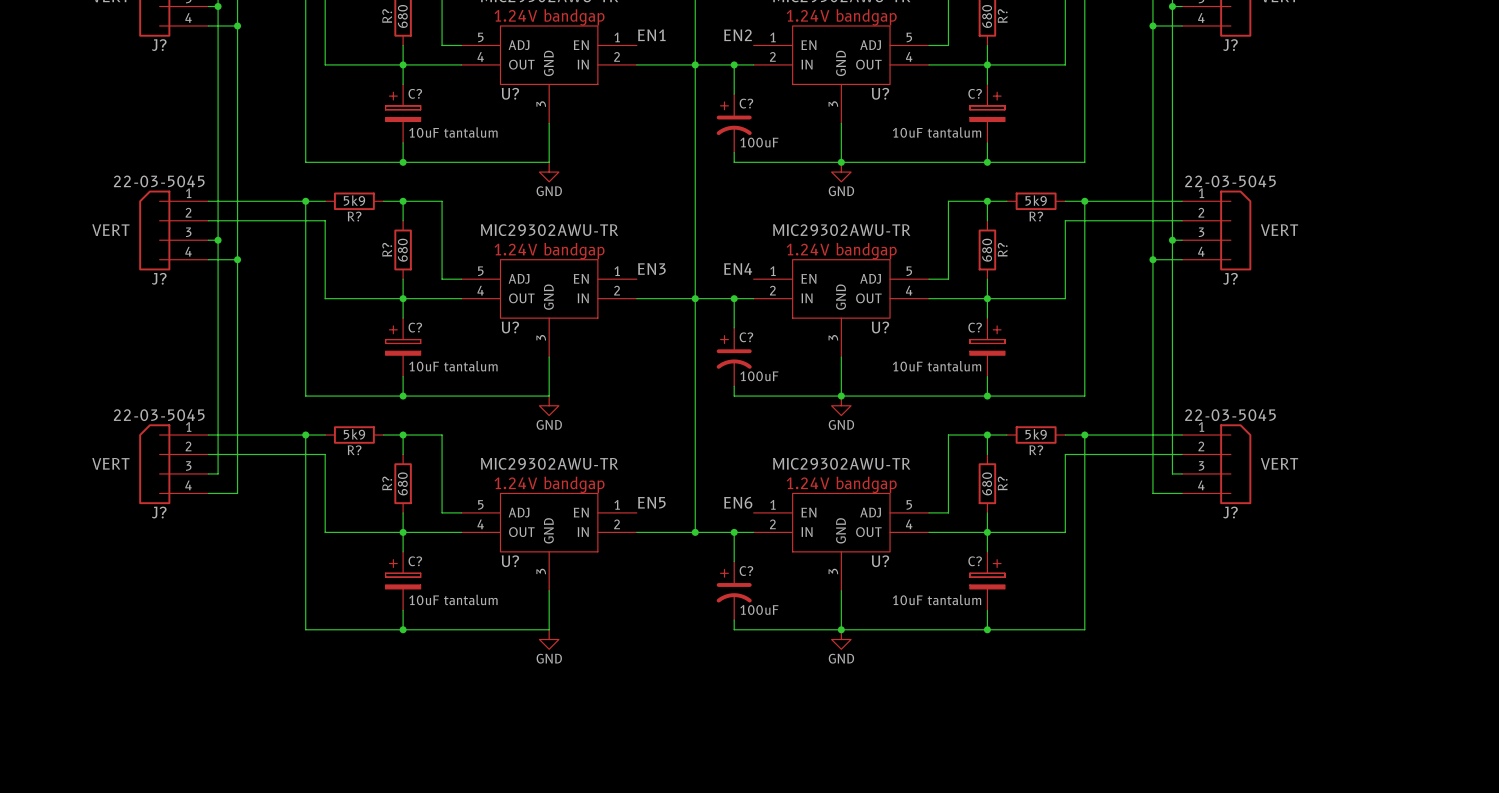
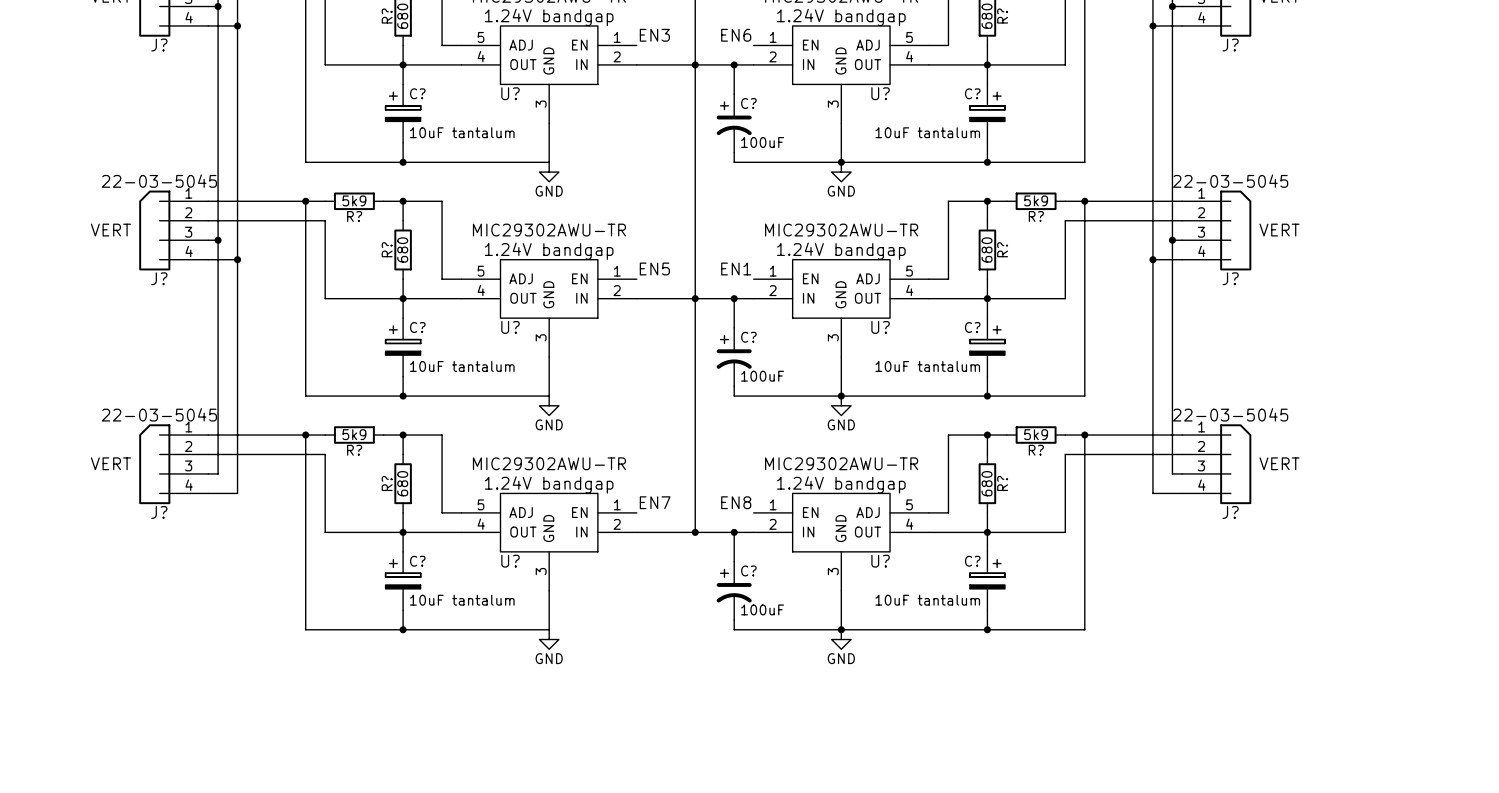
label: EN1 (651, 35) -> EN3 (654, 35)
label: EN2 (737, 35) -> EN6 (736, 35)
label: EN3 (651, 268) -> EN5 (654, 268)
label: EN4 (738, 268) -> EN1 (736, 268)
label: EN5 (651, 502) -> EN7 (655, 502)
label: EN6 (738, 502) -> EN8 (736, 502)

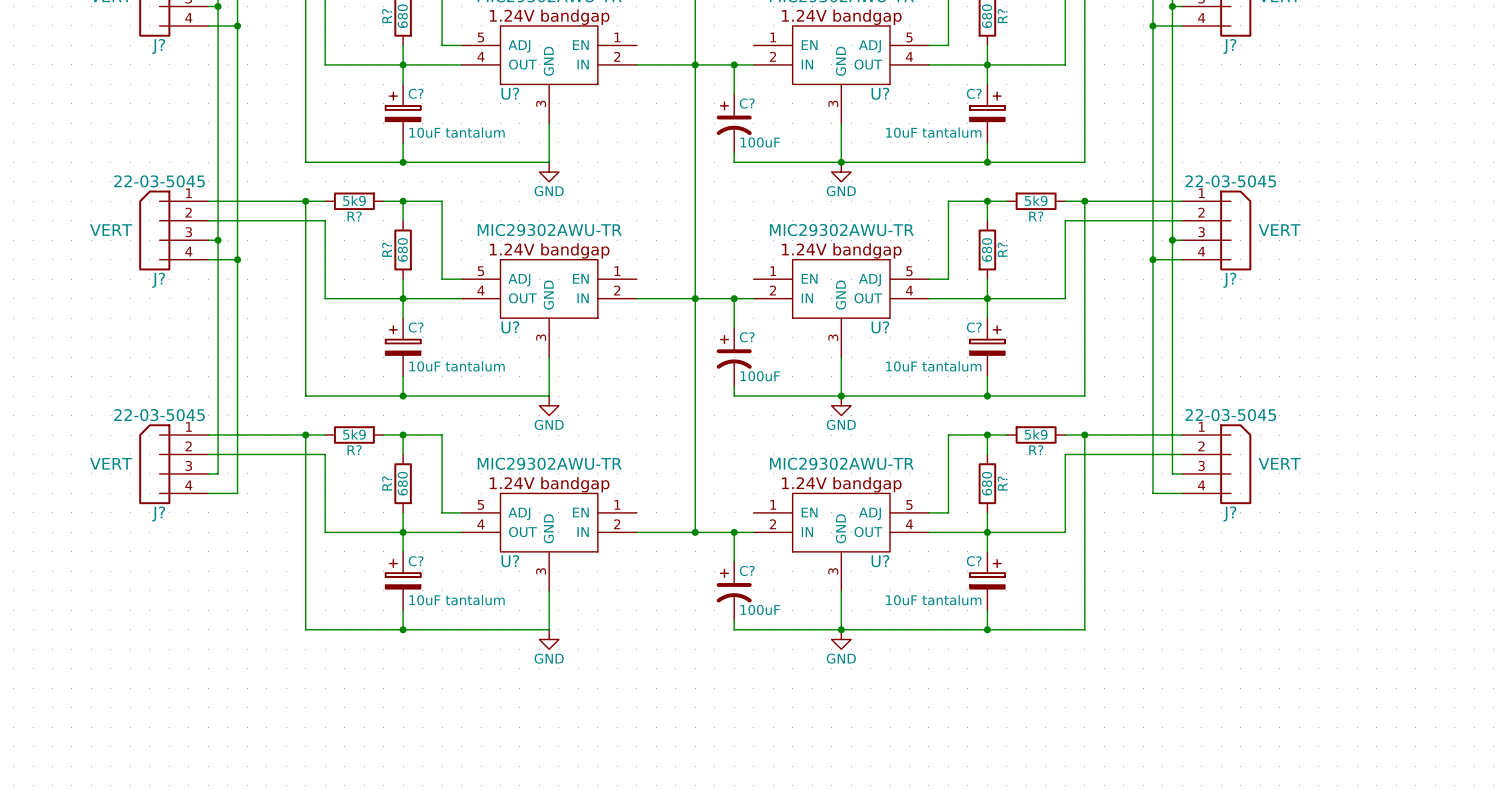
label: EN3 (654, 35) -> none
label: EN6 (736, 35) -> none
label: EN5 (654, 268) -> none
label: EN1 (736, 268) -> none
label: EN7 (655, 502) -> none
label: EN8 (736, 502) -> none

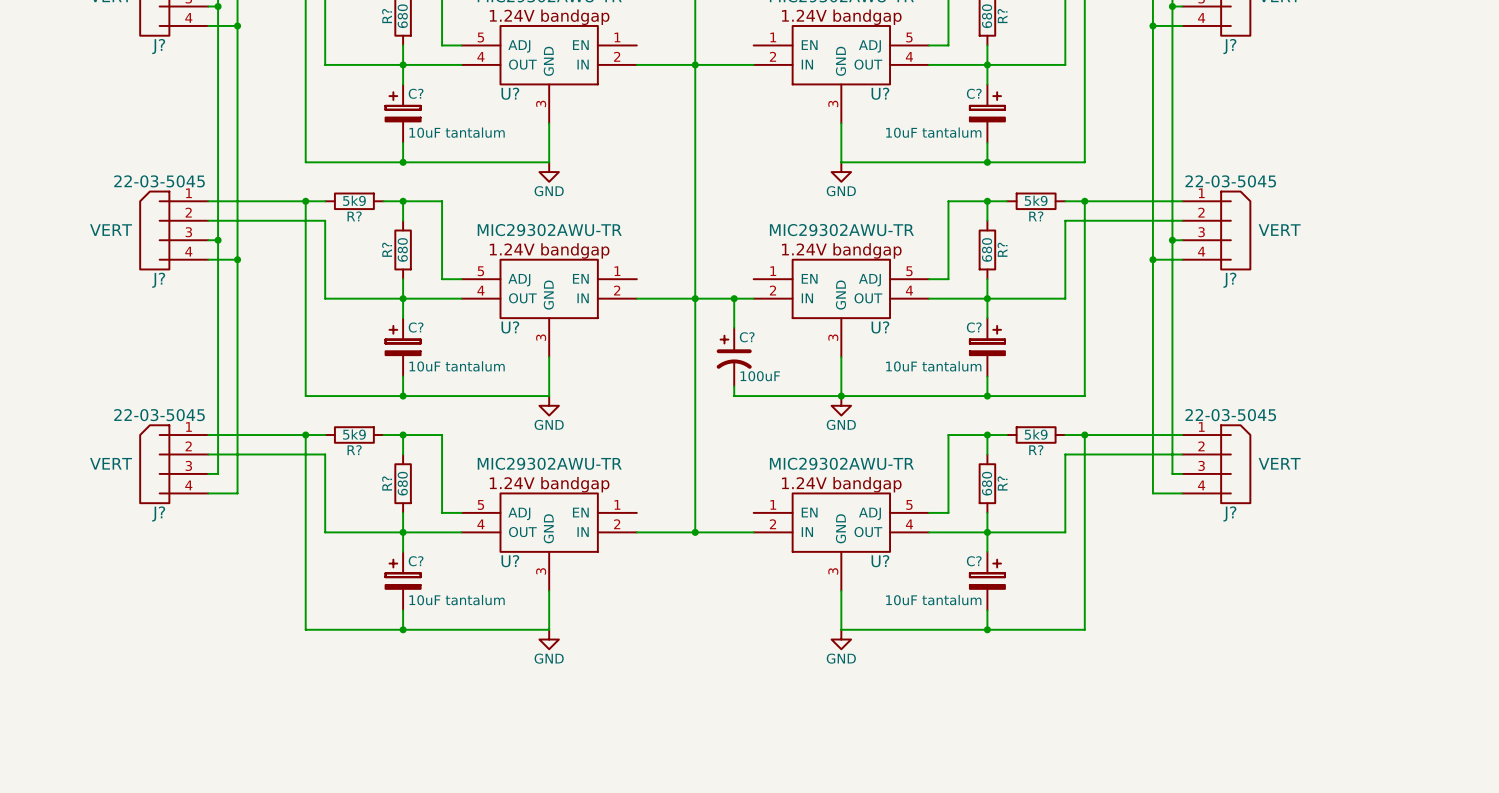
wire: (734, 64) (734, 94) -> none
junction: (734, 64) -> none
C?: 100uF (734, 123) -> none
wire: (734, 152) (734, 162) (841, 162) -> none
junction: (841, 162) -> none
wire: (734, 532) (734, 561) -> none
junction: (734, 532) -> none
C?: 100uF (734, 590) -> none
wire: (734, 620) (734, 629) (841, 629) -> none
junction: (841, 629) -> none

